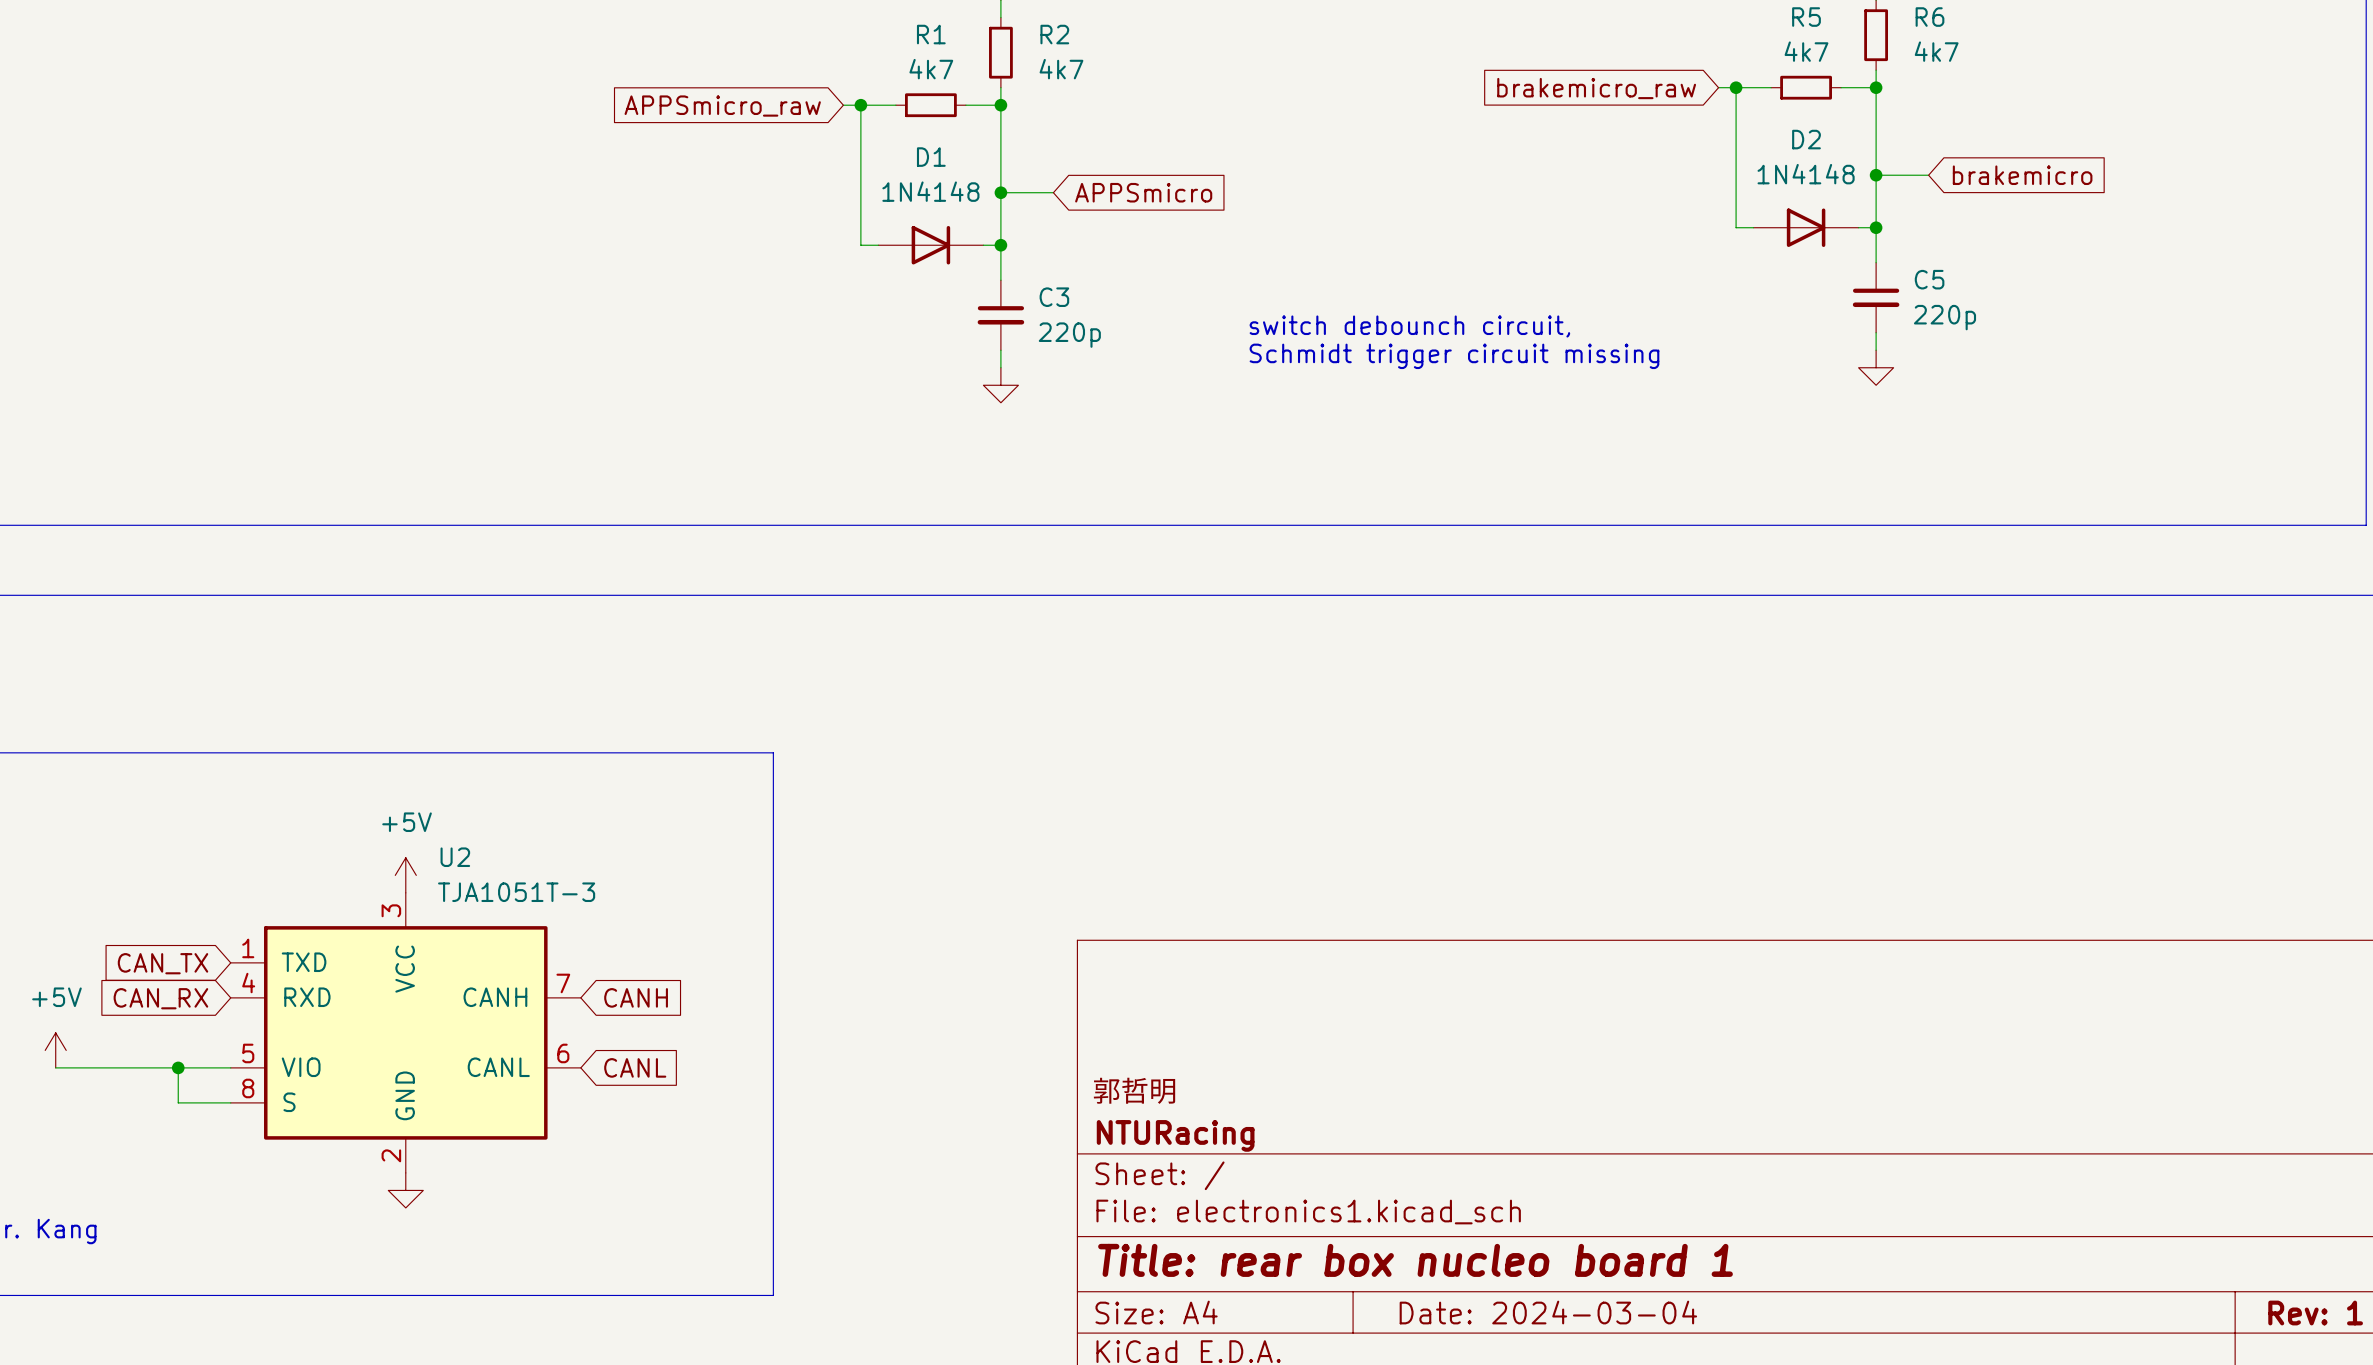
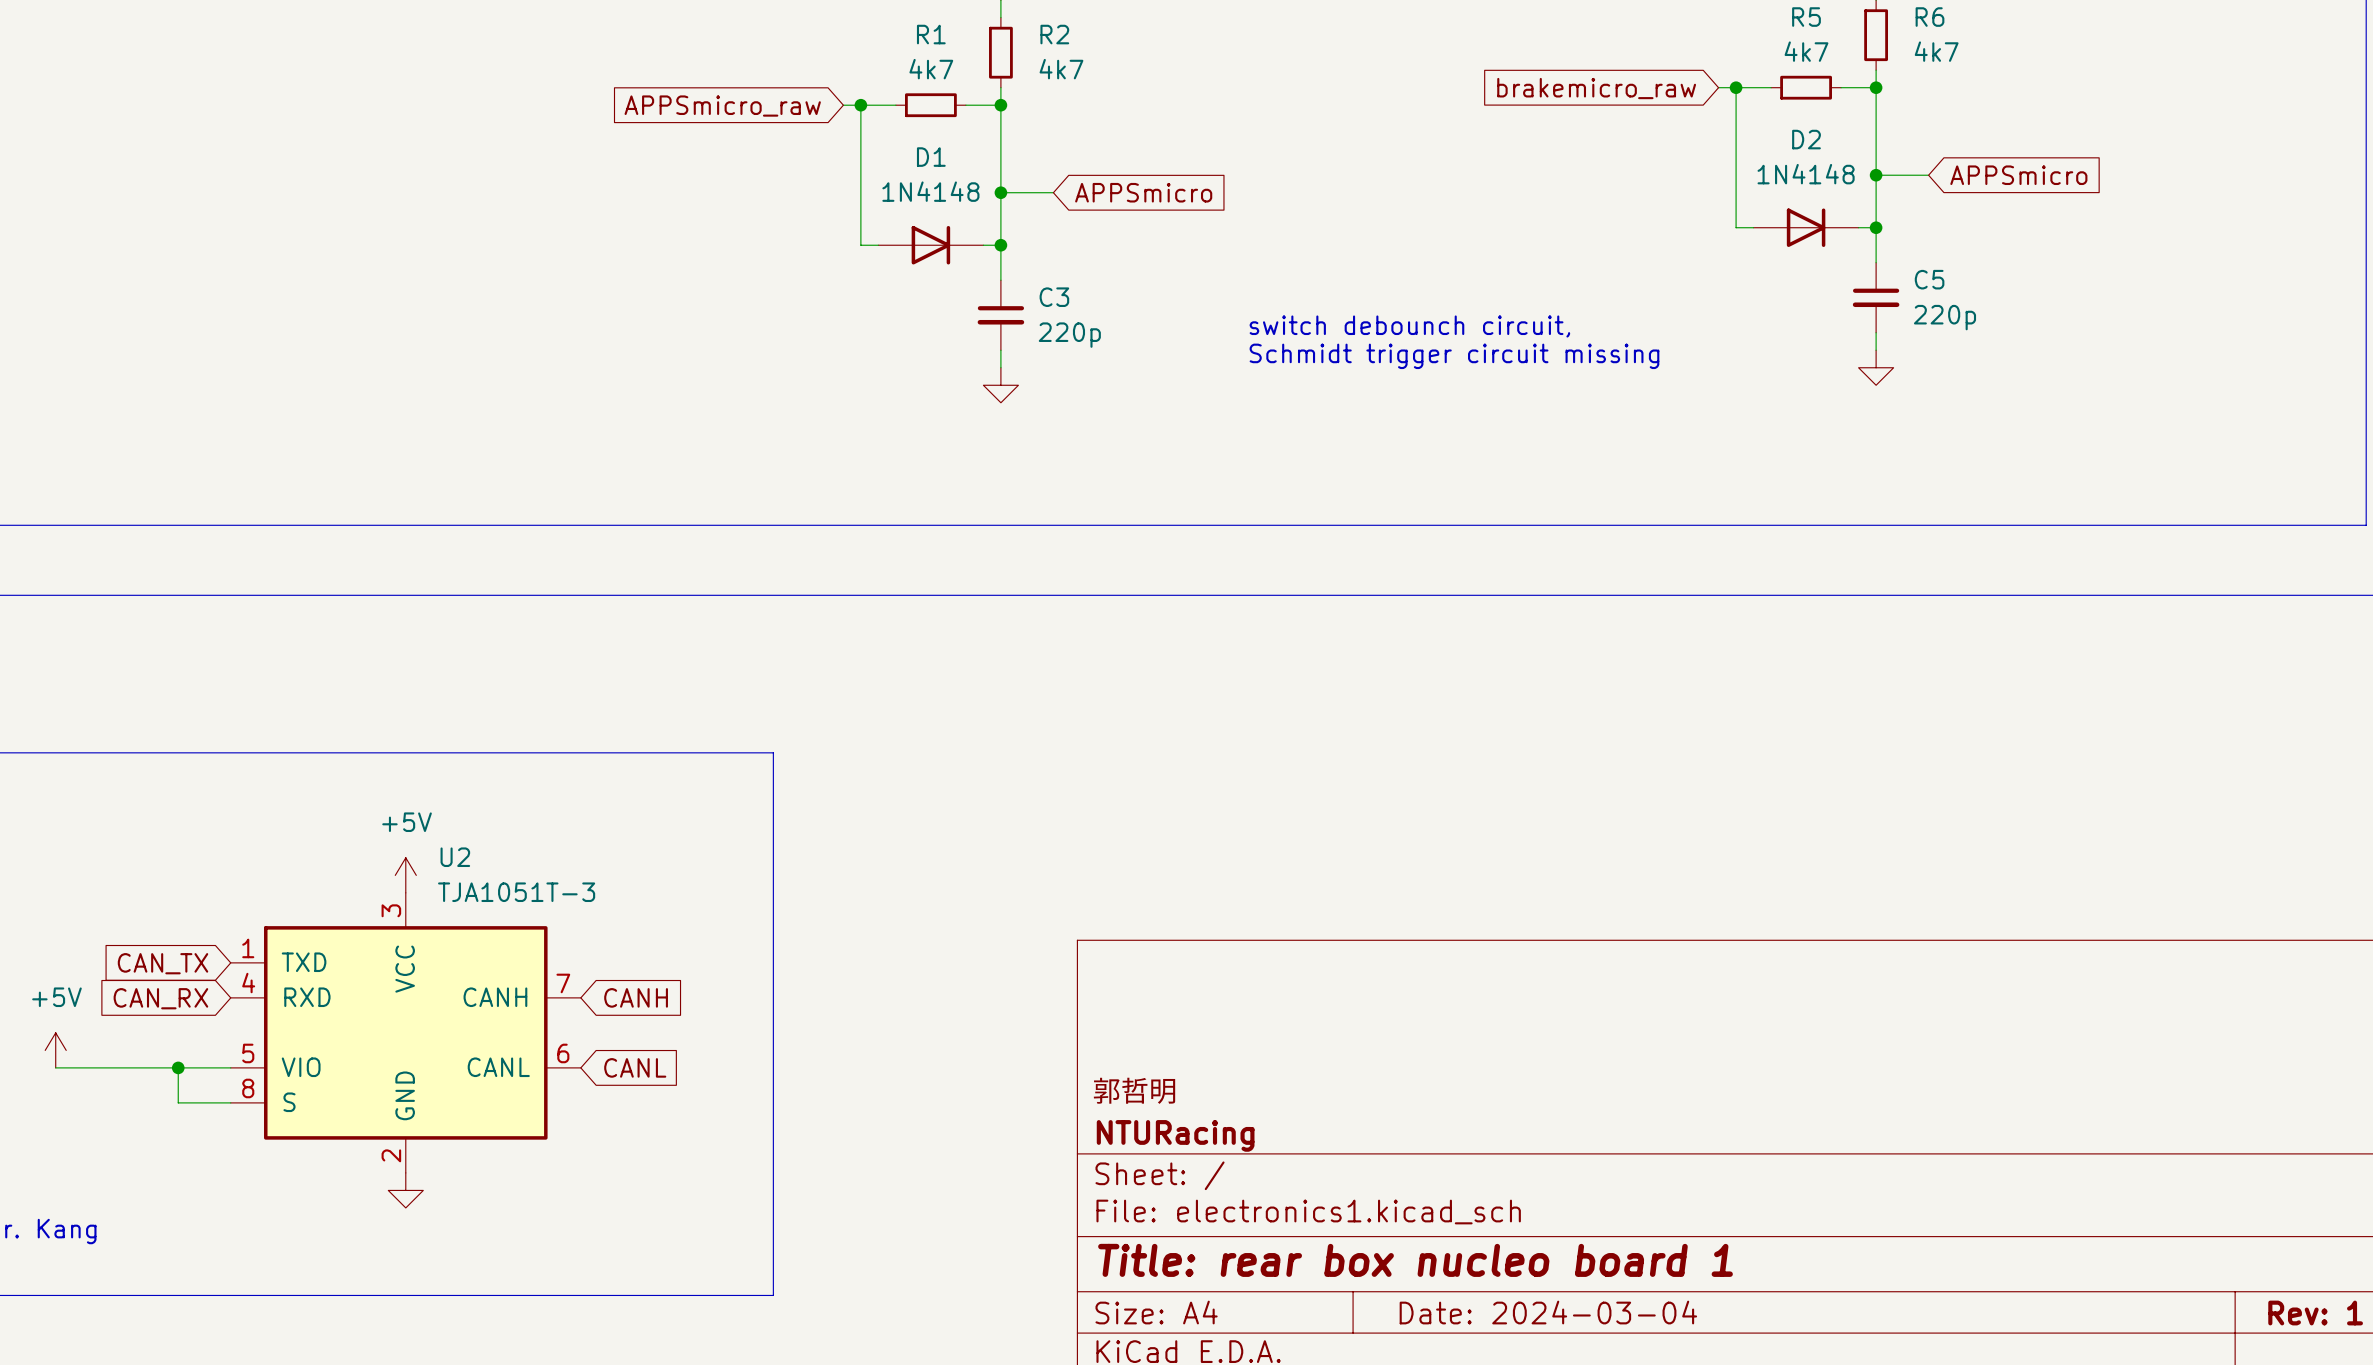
global label: brakemicro (2022, 175) -> APPSmicro (2018, 175)

